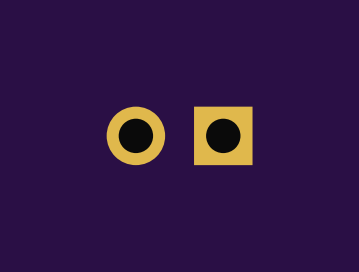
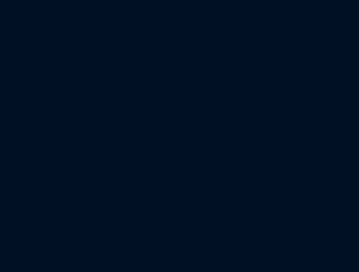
part: (179, 135) -> none

